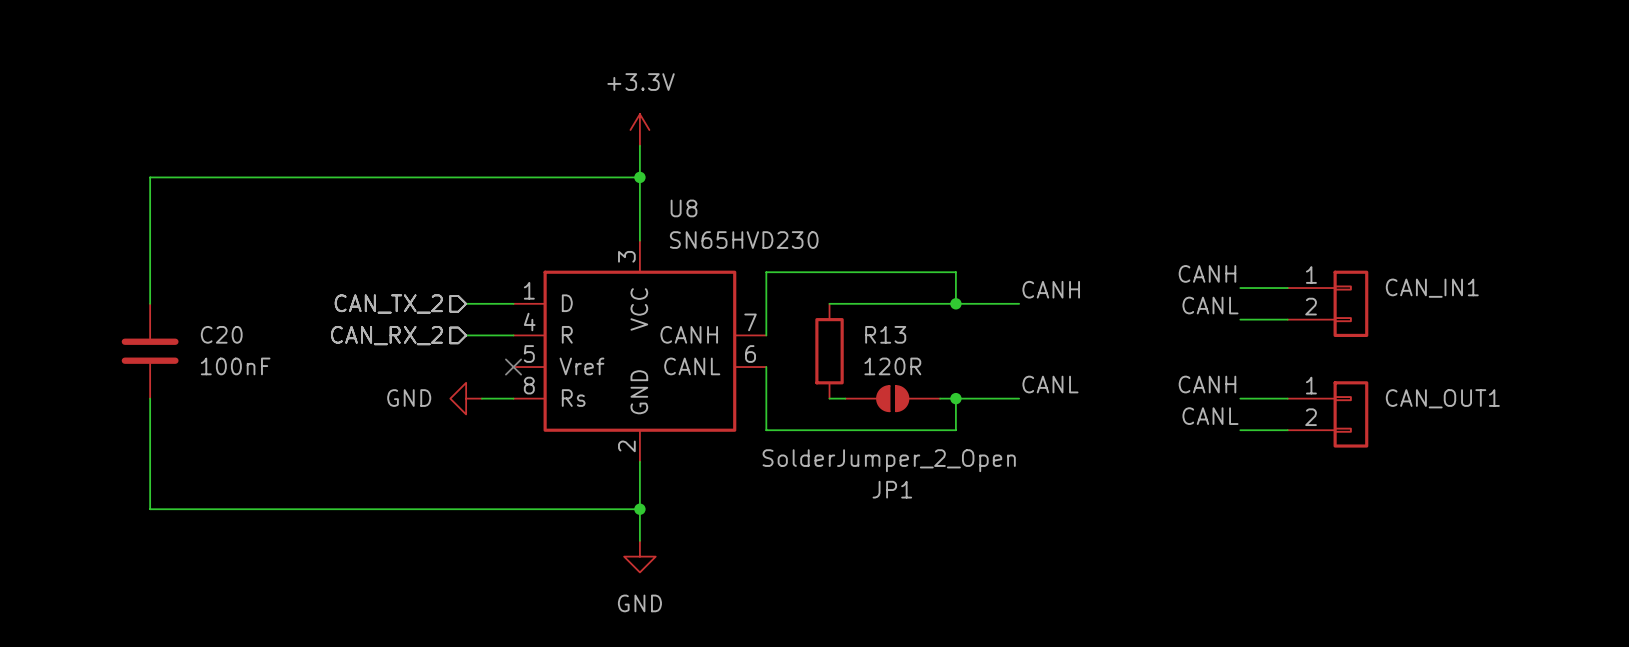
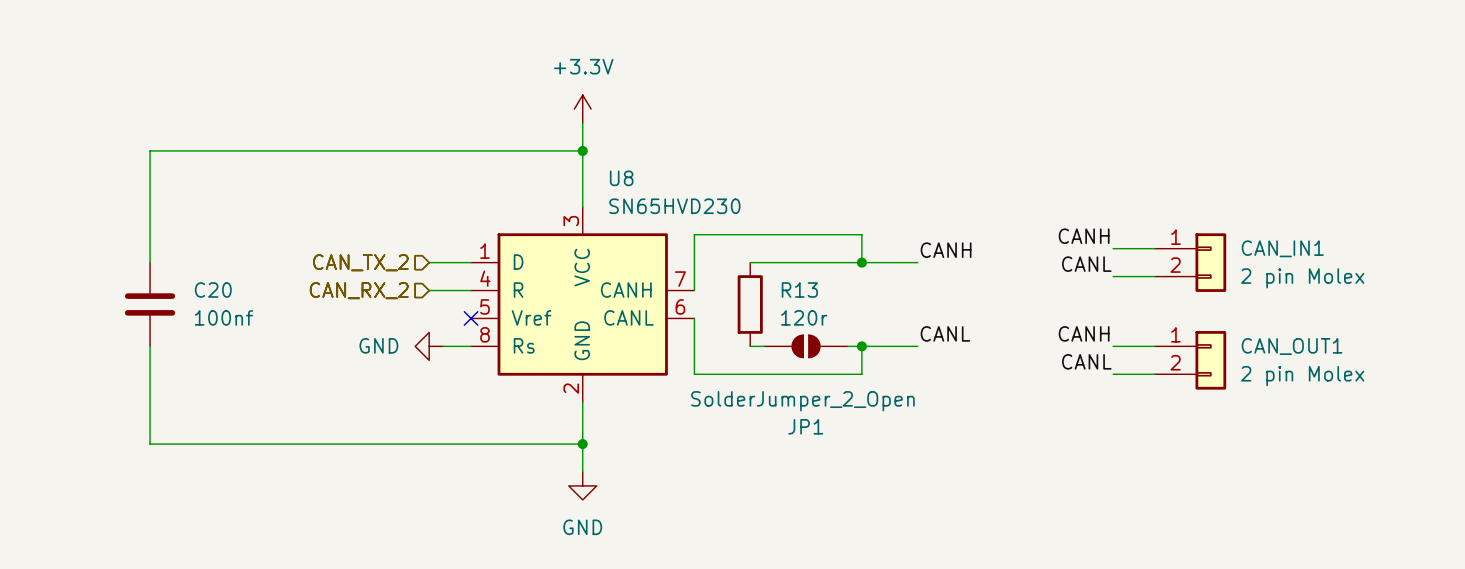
CAN_IN1 value: none -> 2 pin Molex (1302, 278)
C20 value: 100nF (235, 366) -> 100nf (223, 317)
R13 value: 120R (892, 366) -> 120r (804, 317)
CAN_OUT1 value: none -> 2 pin Molex (1302, 376)

